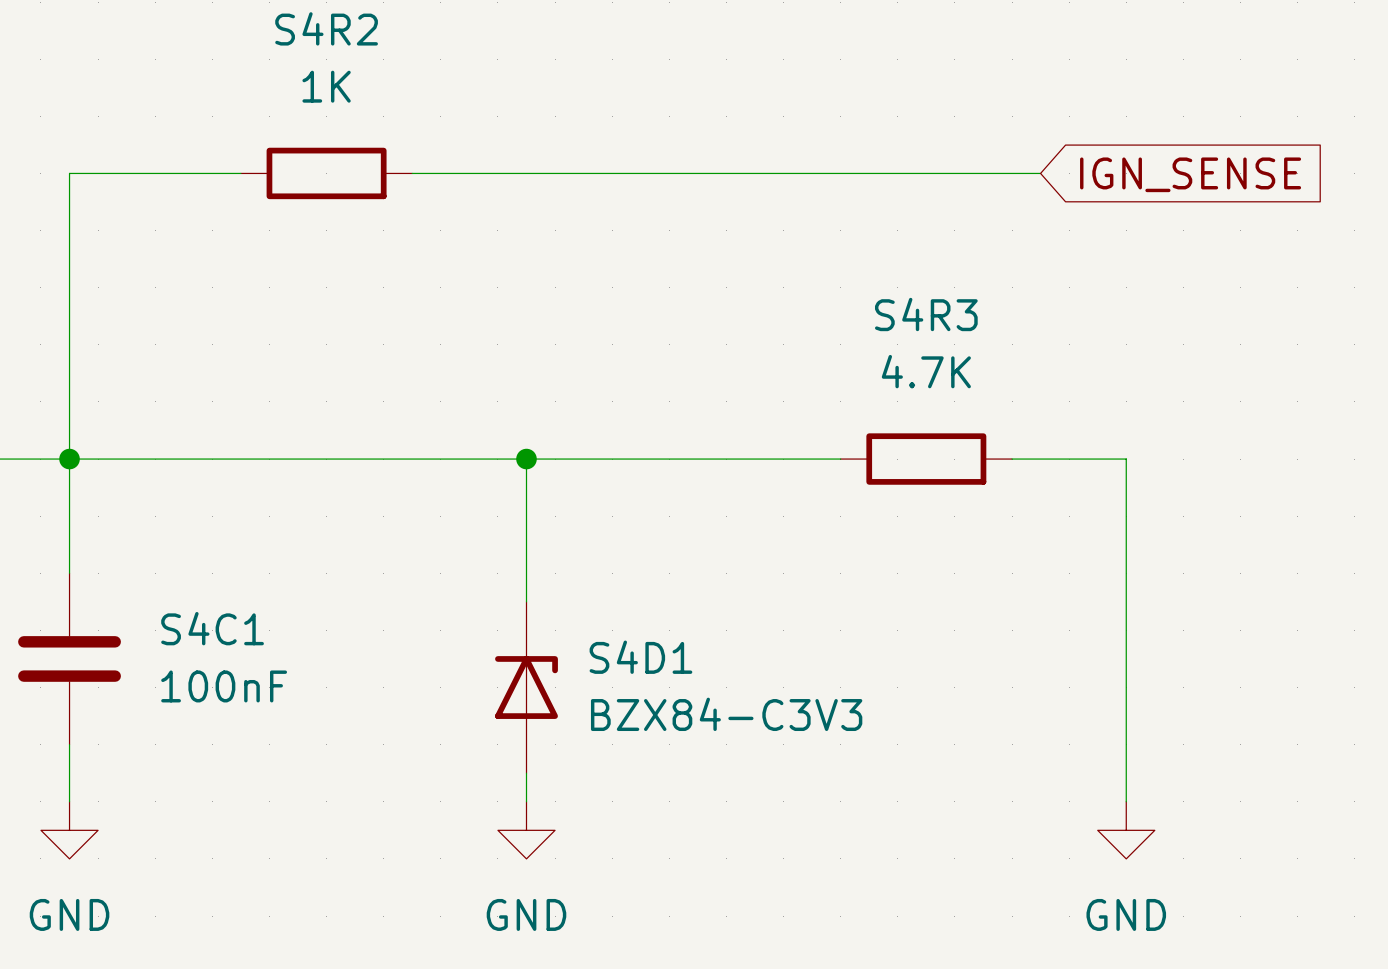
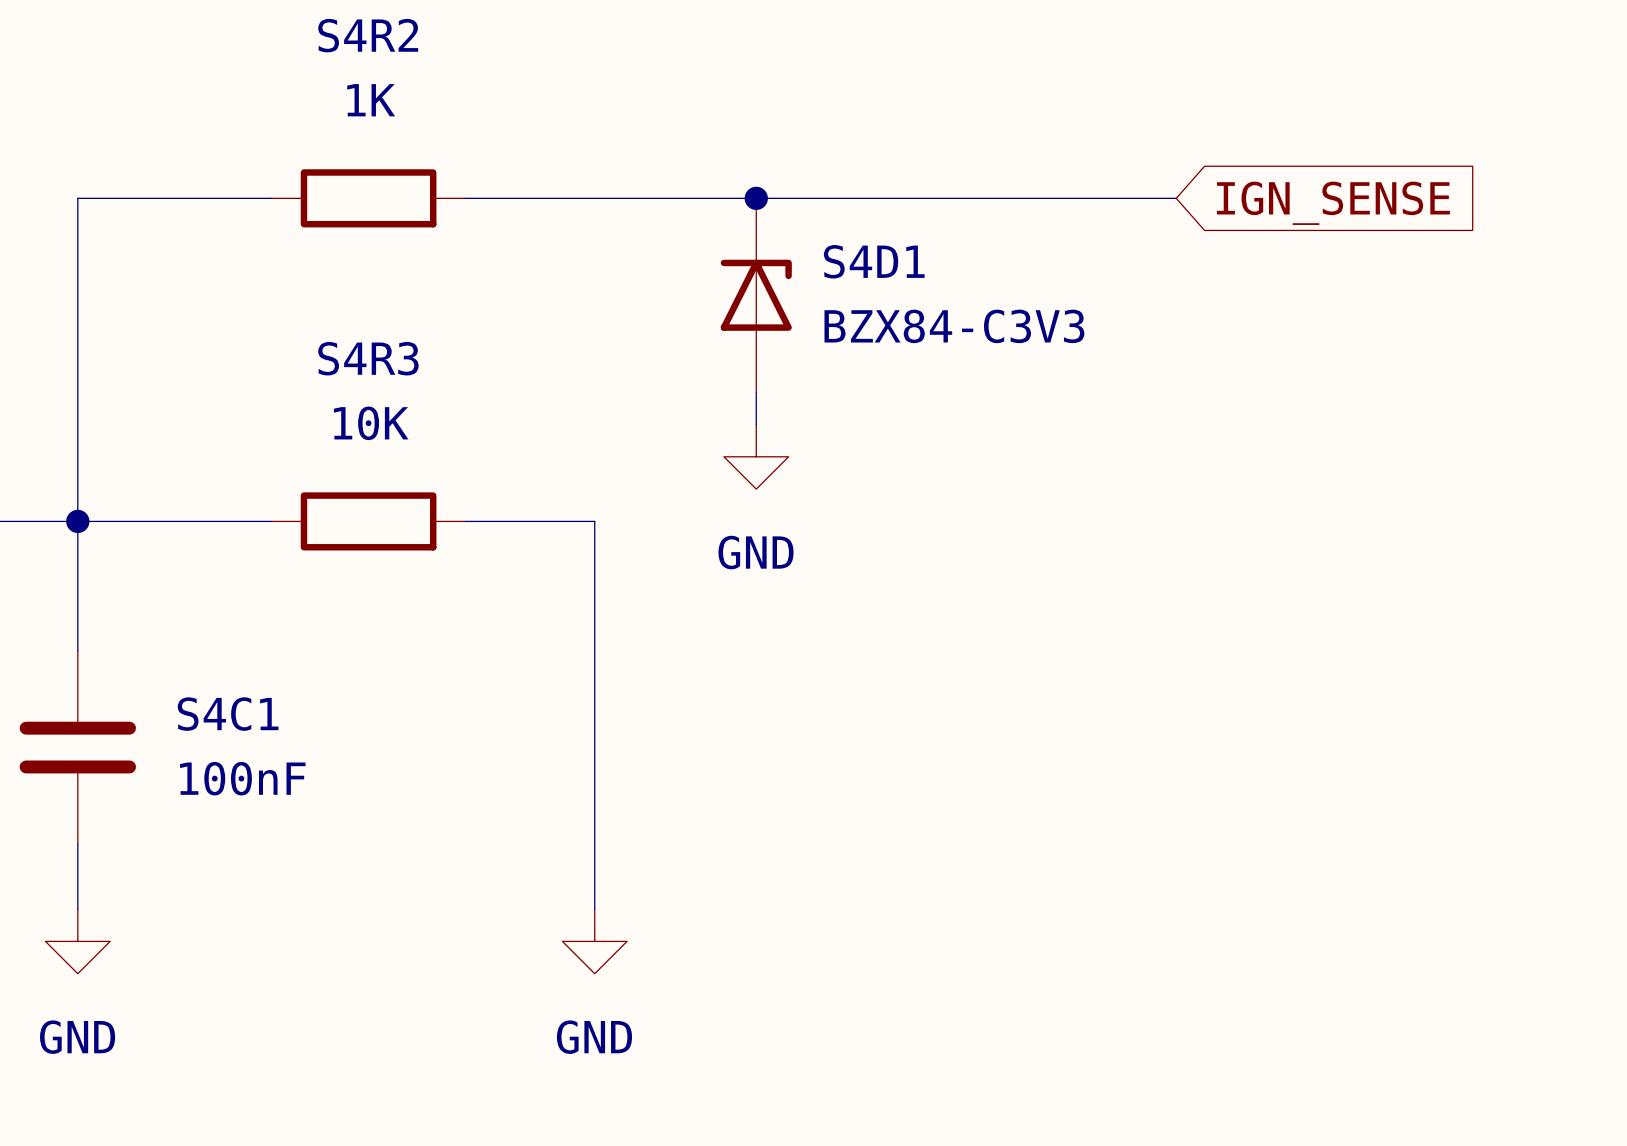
junction: none -> (756, 198)
wire: none -> (756, 392) (756, 424)
S4R3 value: 4.7K (926, 371) -> 10K (371, 423)
power symbol: none -> GND (756, 456)
wire: (240, 459) (412, 459) -> none
wire: (526, 459) (840, 459) -> none
junction: (526, 459) -> none
S4R3 position: (926, 459) -> (368, 521)
wire: (1012, 459) (1126, 459) (1126, 801) -> none
S4D1 position: (526, 687) -> (756, 295)
power symbol: GND (1126, 830) -> none

